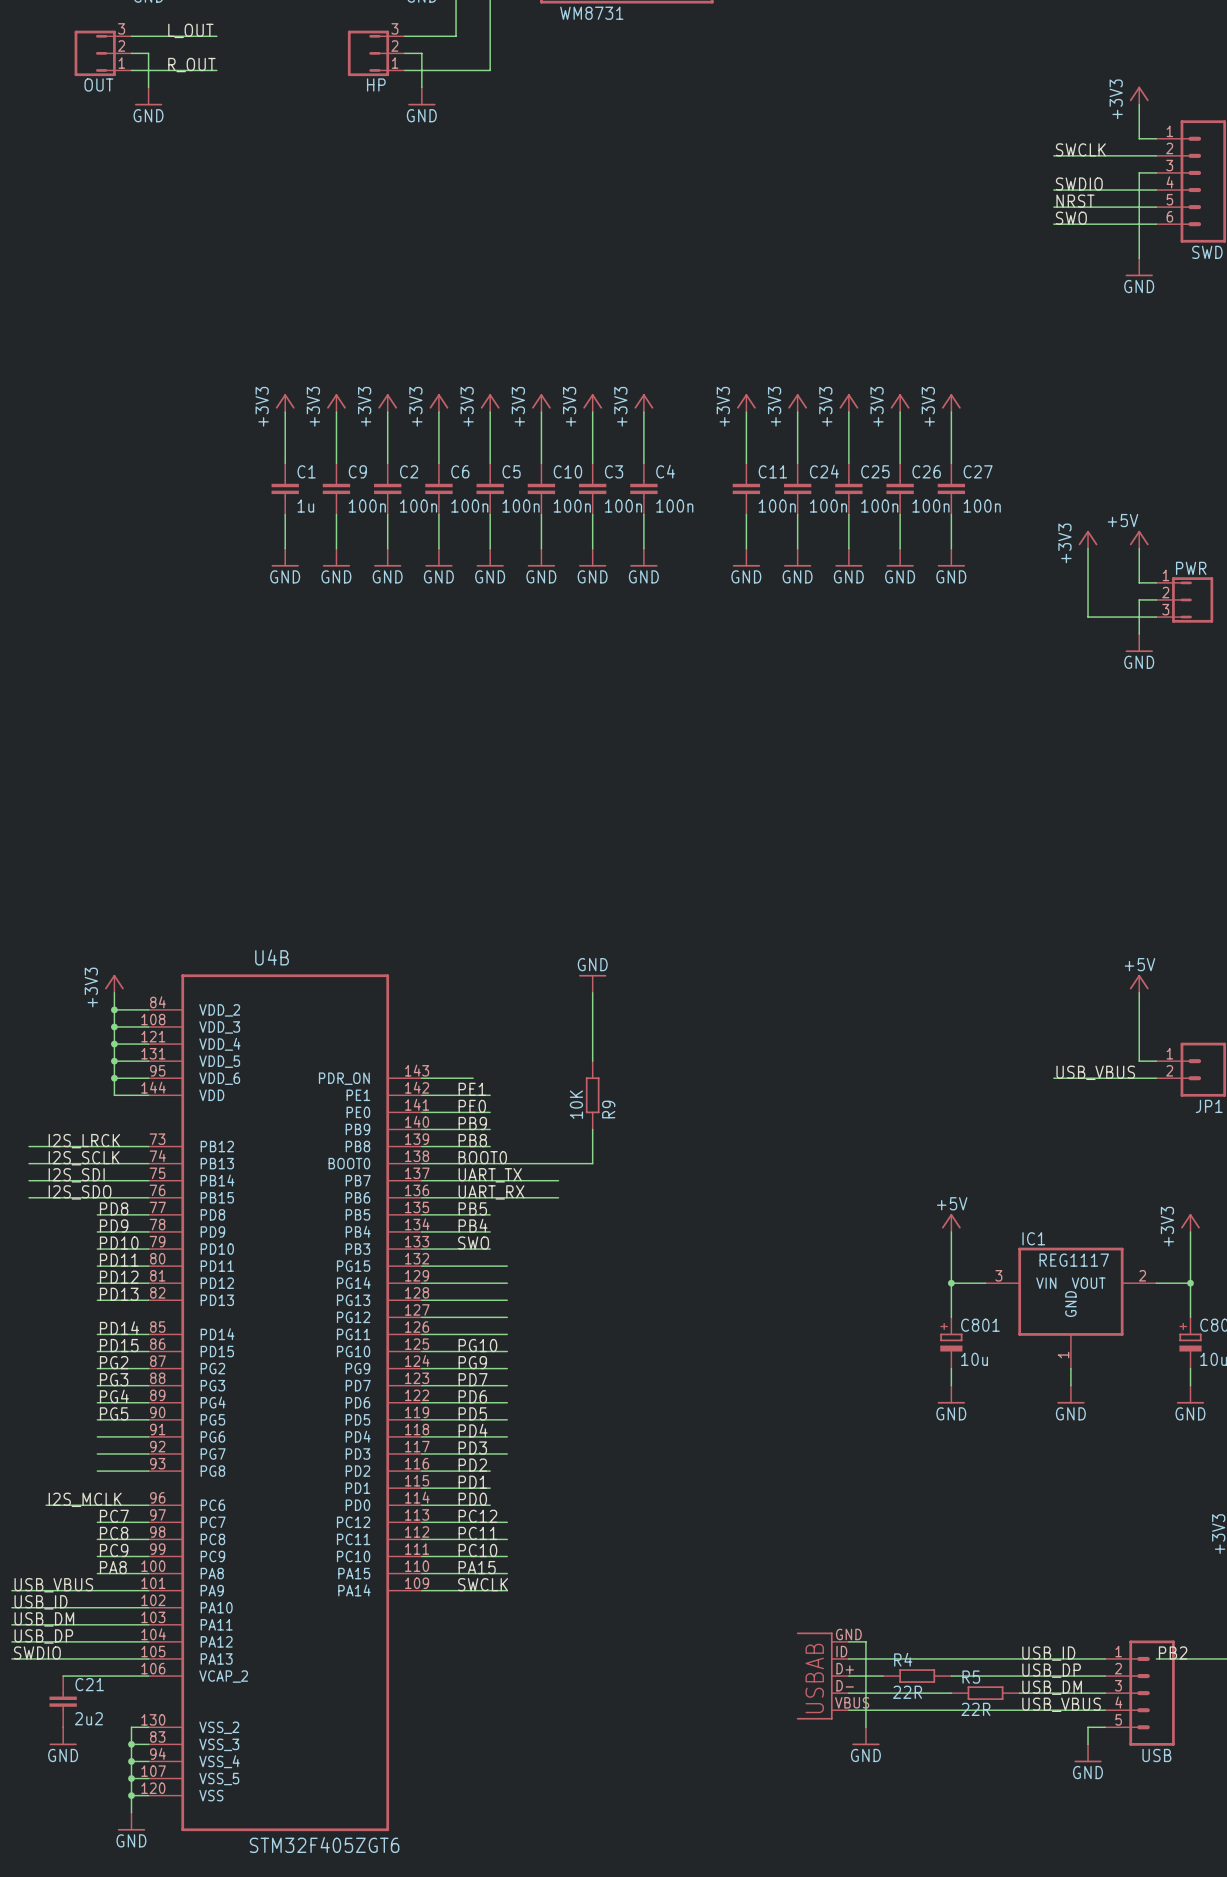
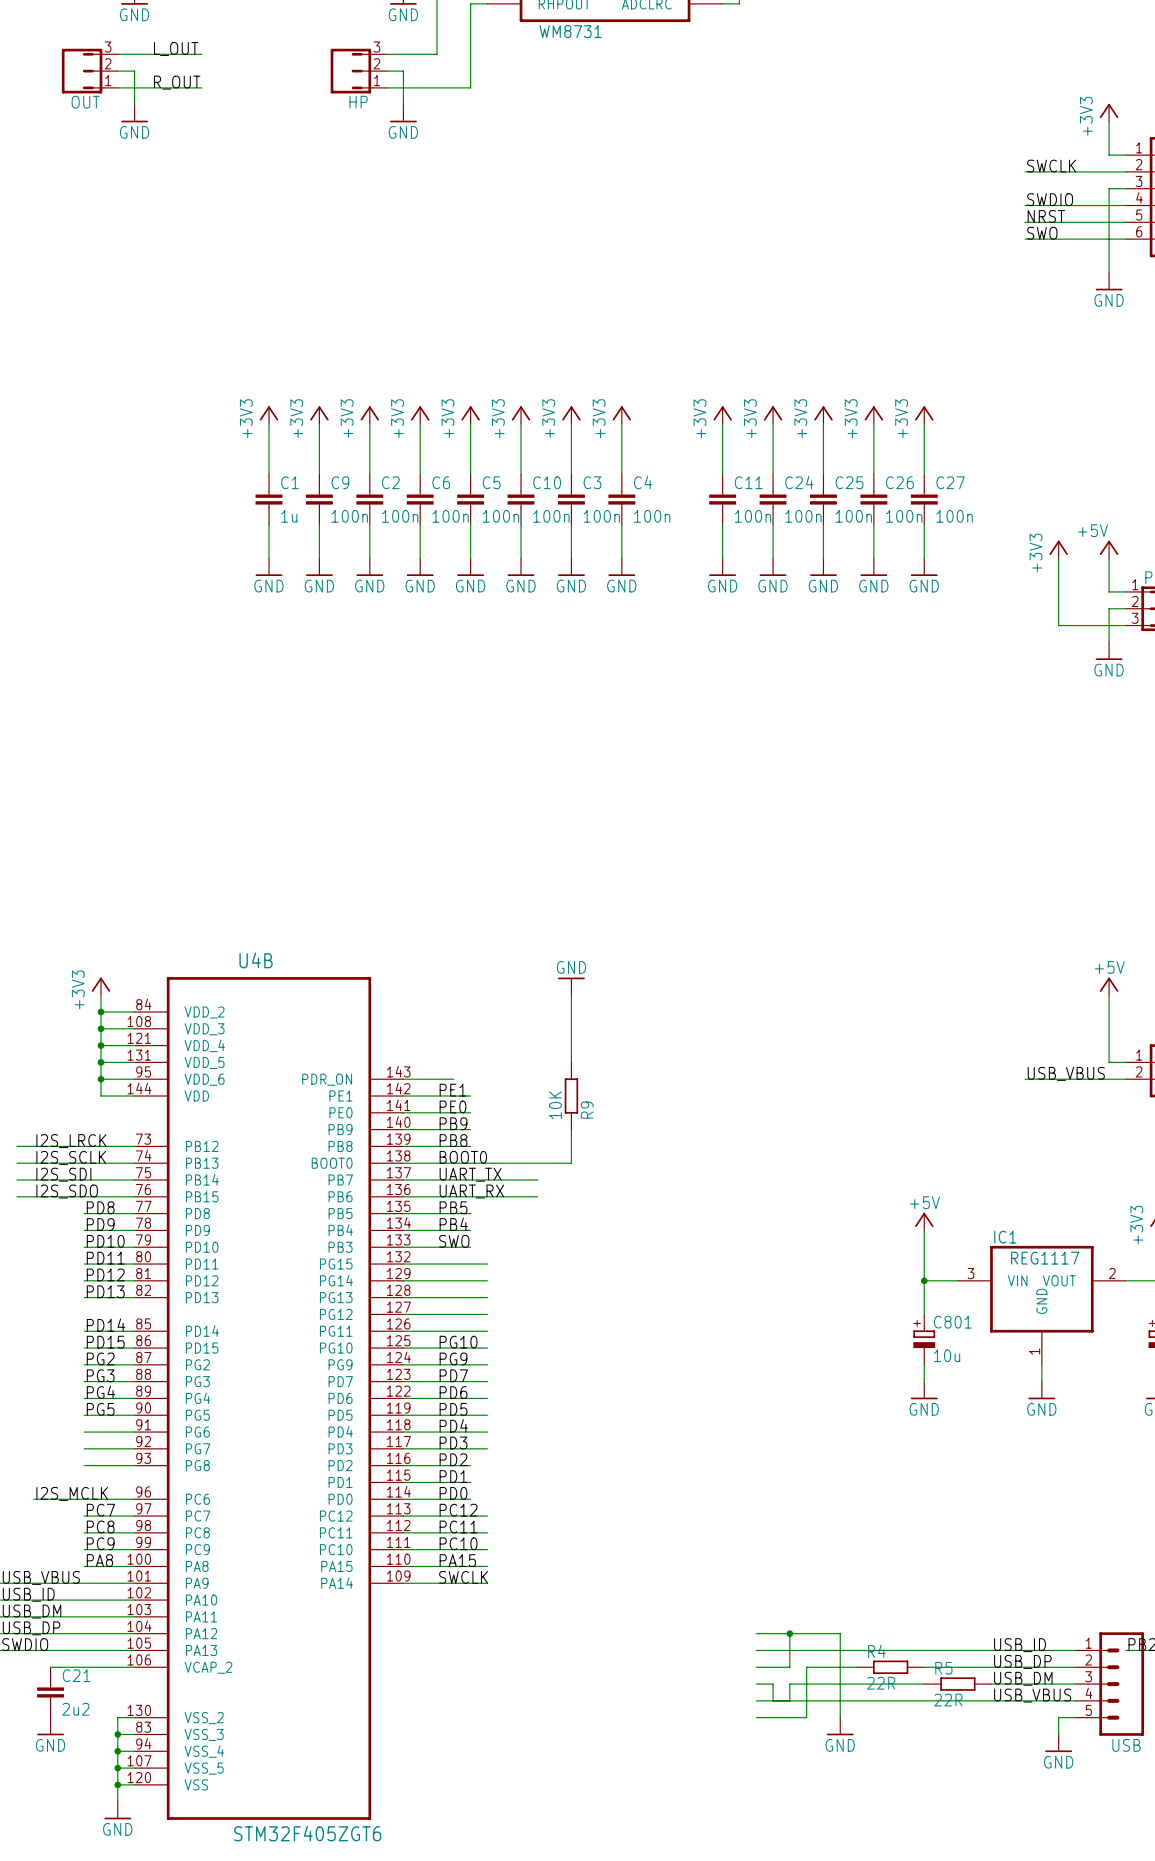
wire: none -> (756, 1633) (823, 1633)
wire: none -> (789, 1633) (789, 1667) (756, 1667)
junction: none -> (789, 1633)
wire: none -> (756, 1650) (823, 1650)
part: (822, 1676) -> none
wire: none -> (823, 1667) (806, 1667) (806, 1717) (756, 1717)
wire: none -> (756, 1684) (773, 1684) (773, 1700)
wire: none -> (823, 1684) (789, 1684) (789, 1700)
wire: none -> (756, 1700) (823, 1700)

